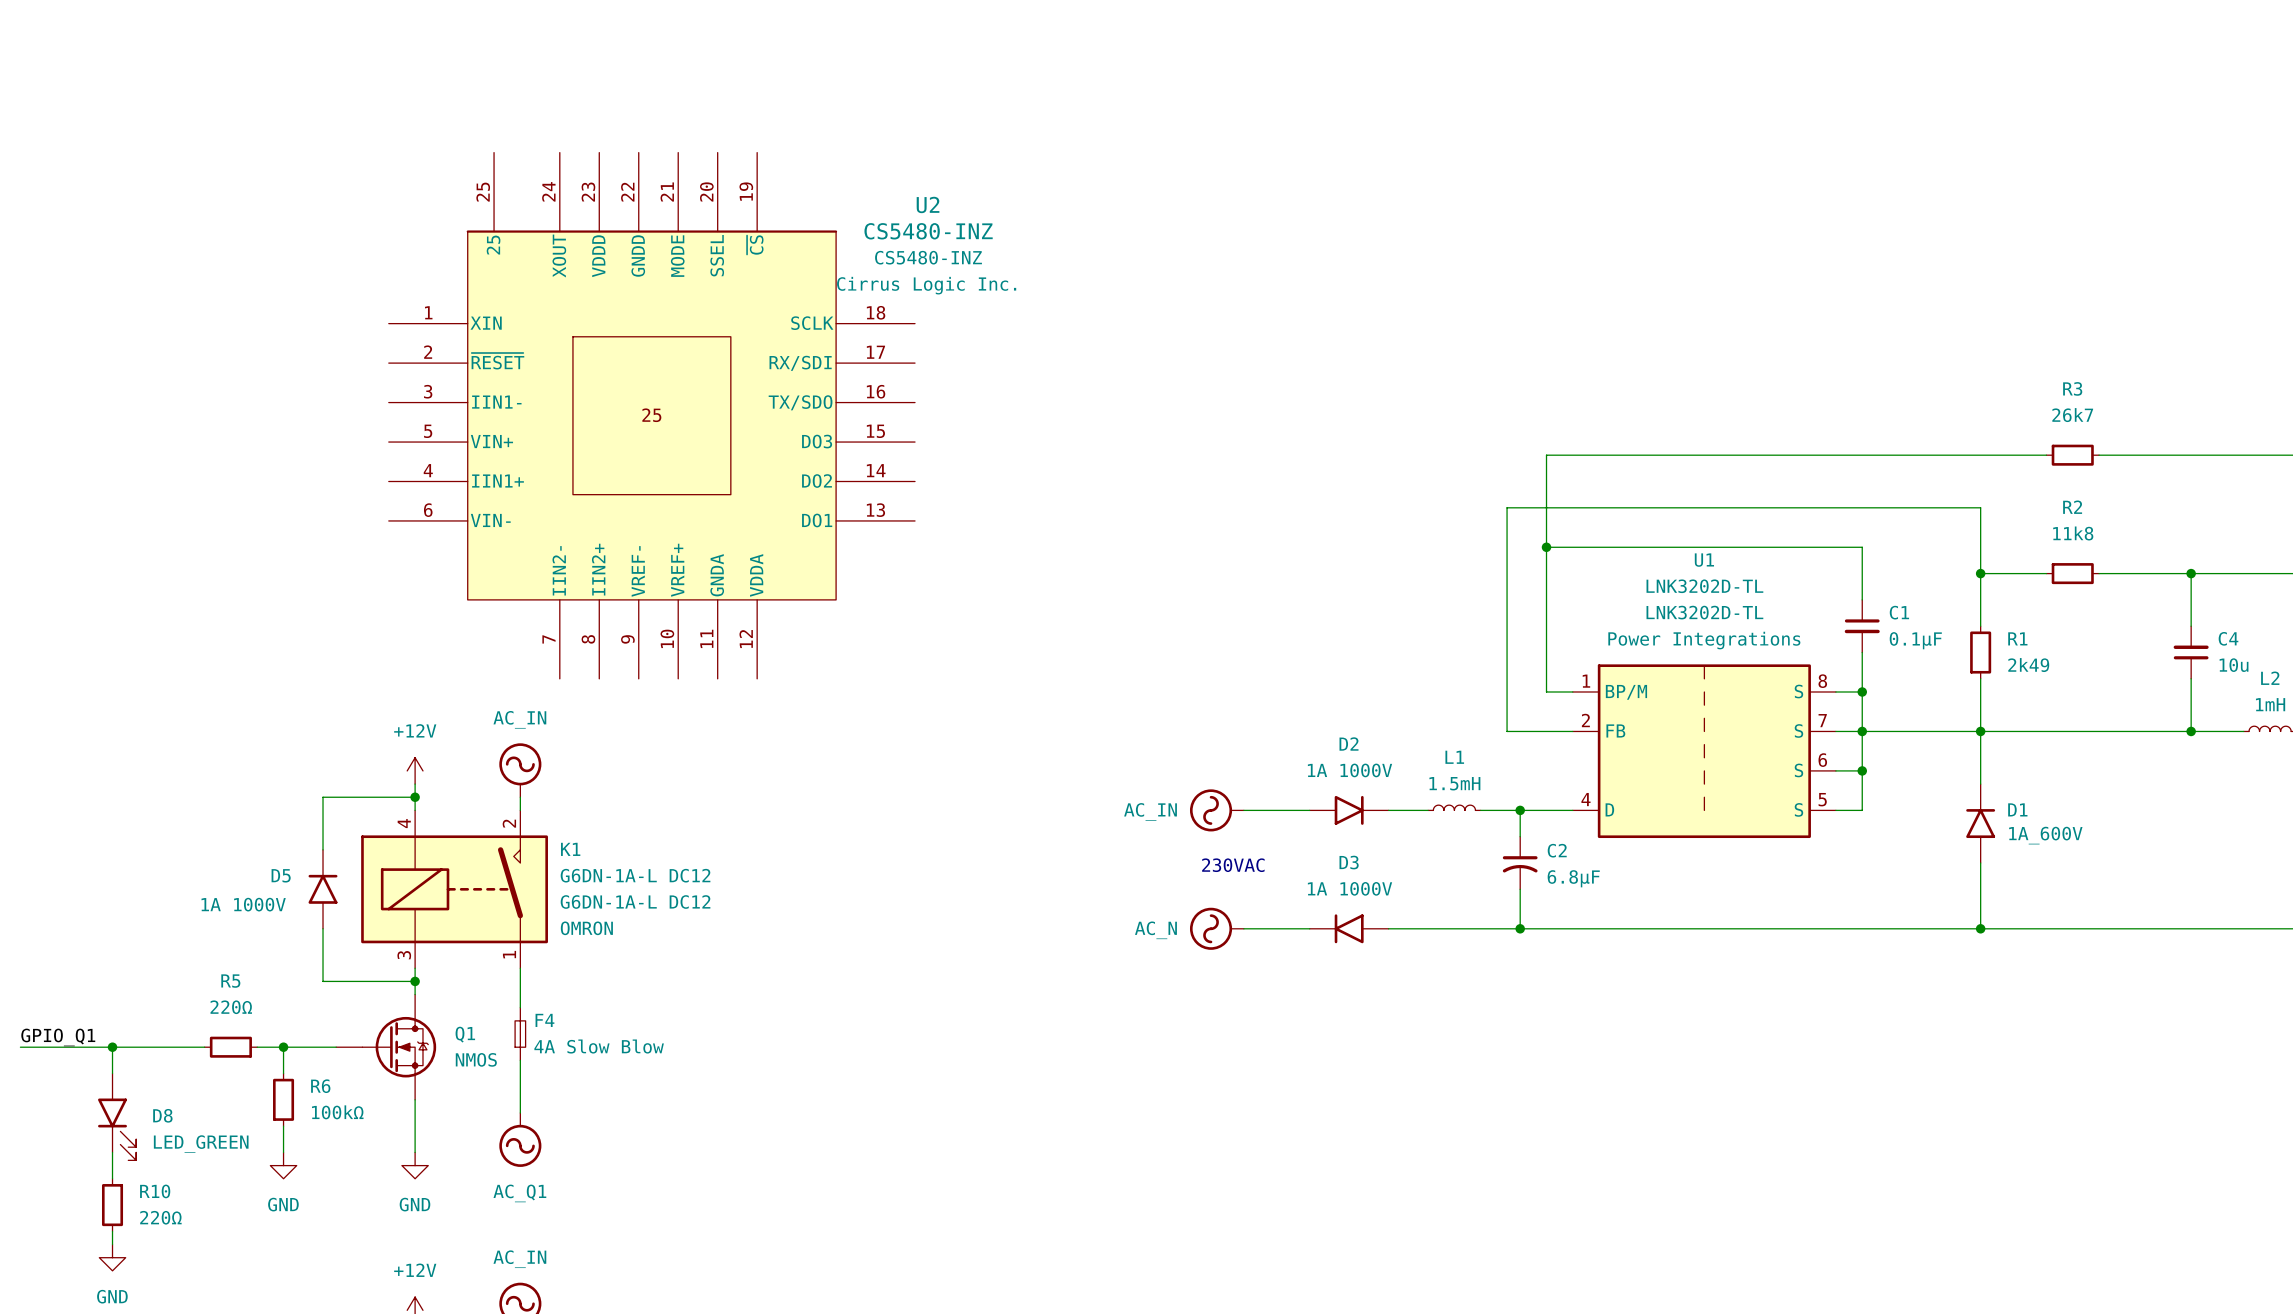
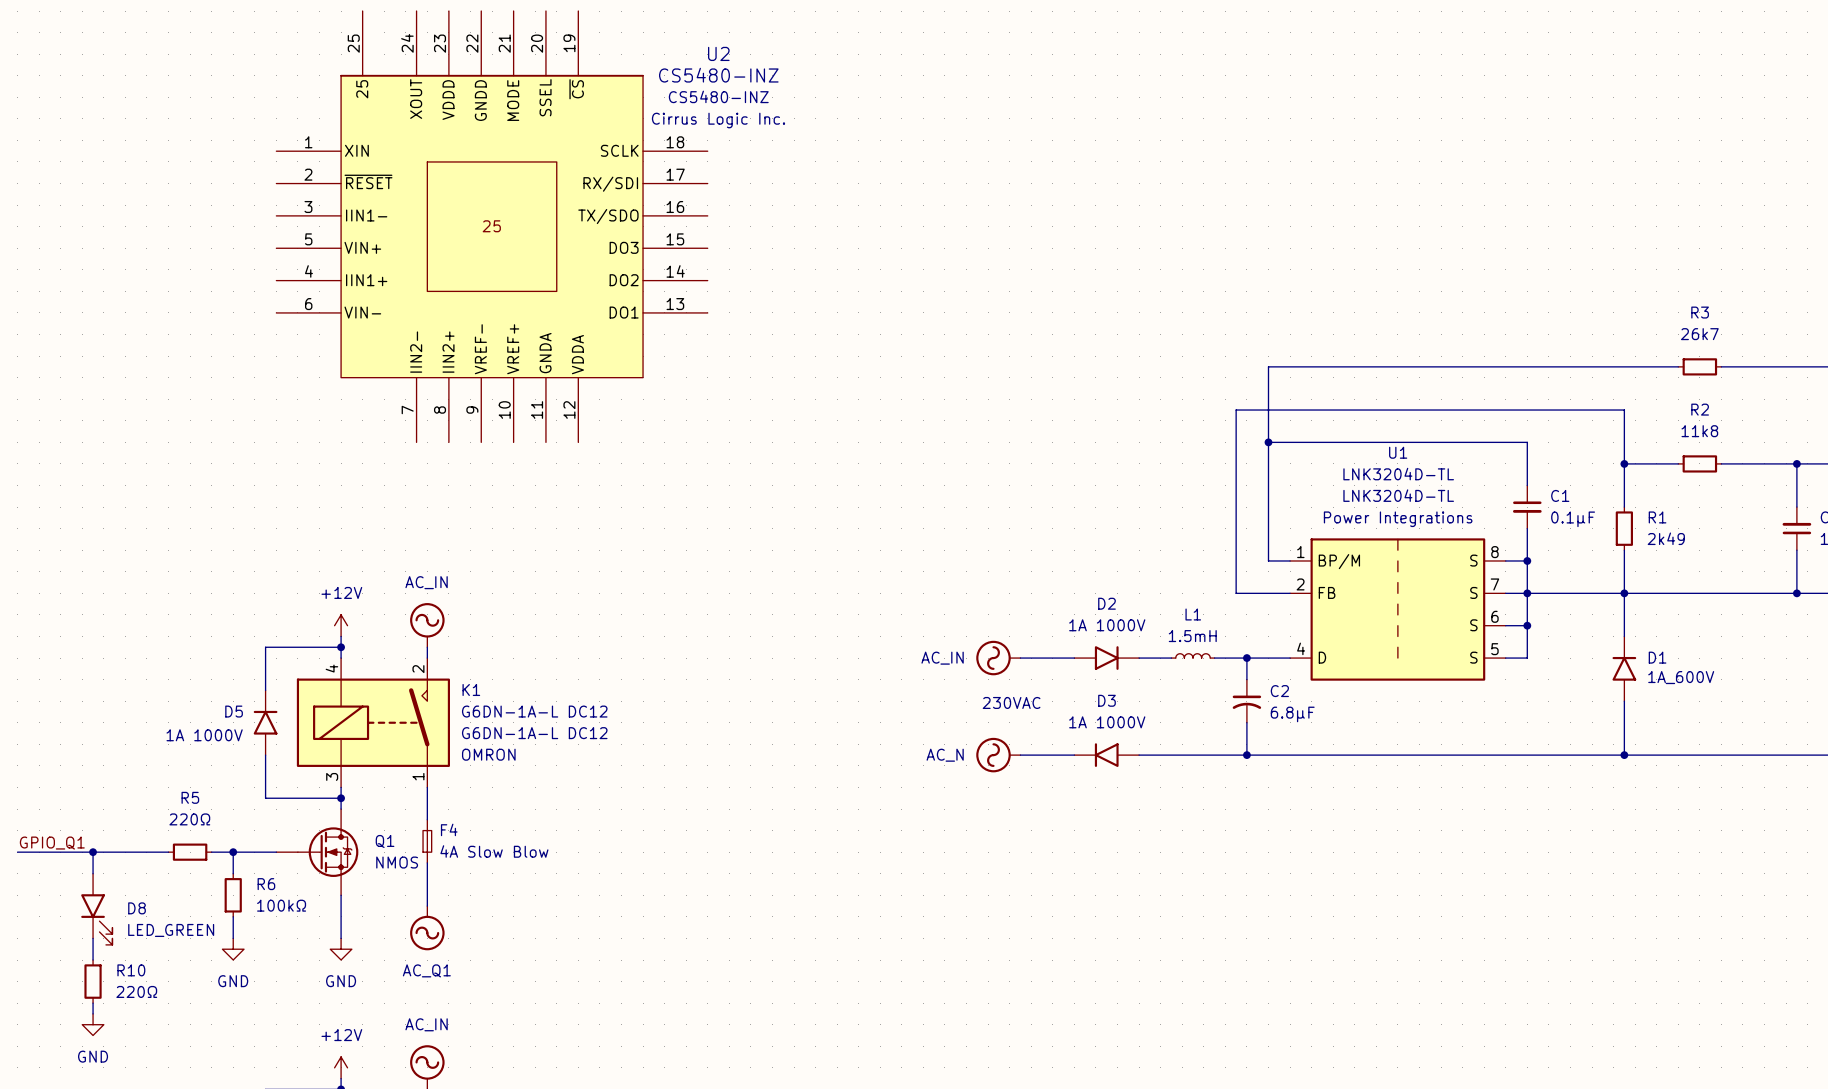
U2 position: (651, 415) -> (492, 226)
U1 value: LNK3202D-TL (1704, 586) -> LNK3204D-TL (1398, 474)
U1 text: LNK3202D-TL (1704, 612) -> LNK3204D-TL (1398, 495)

